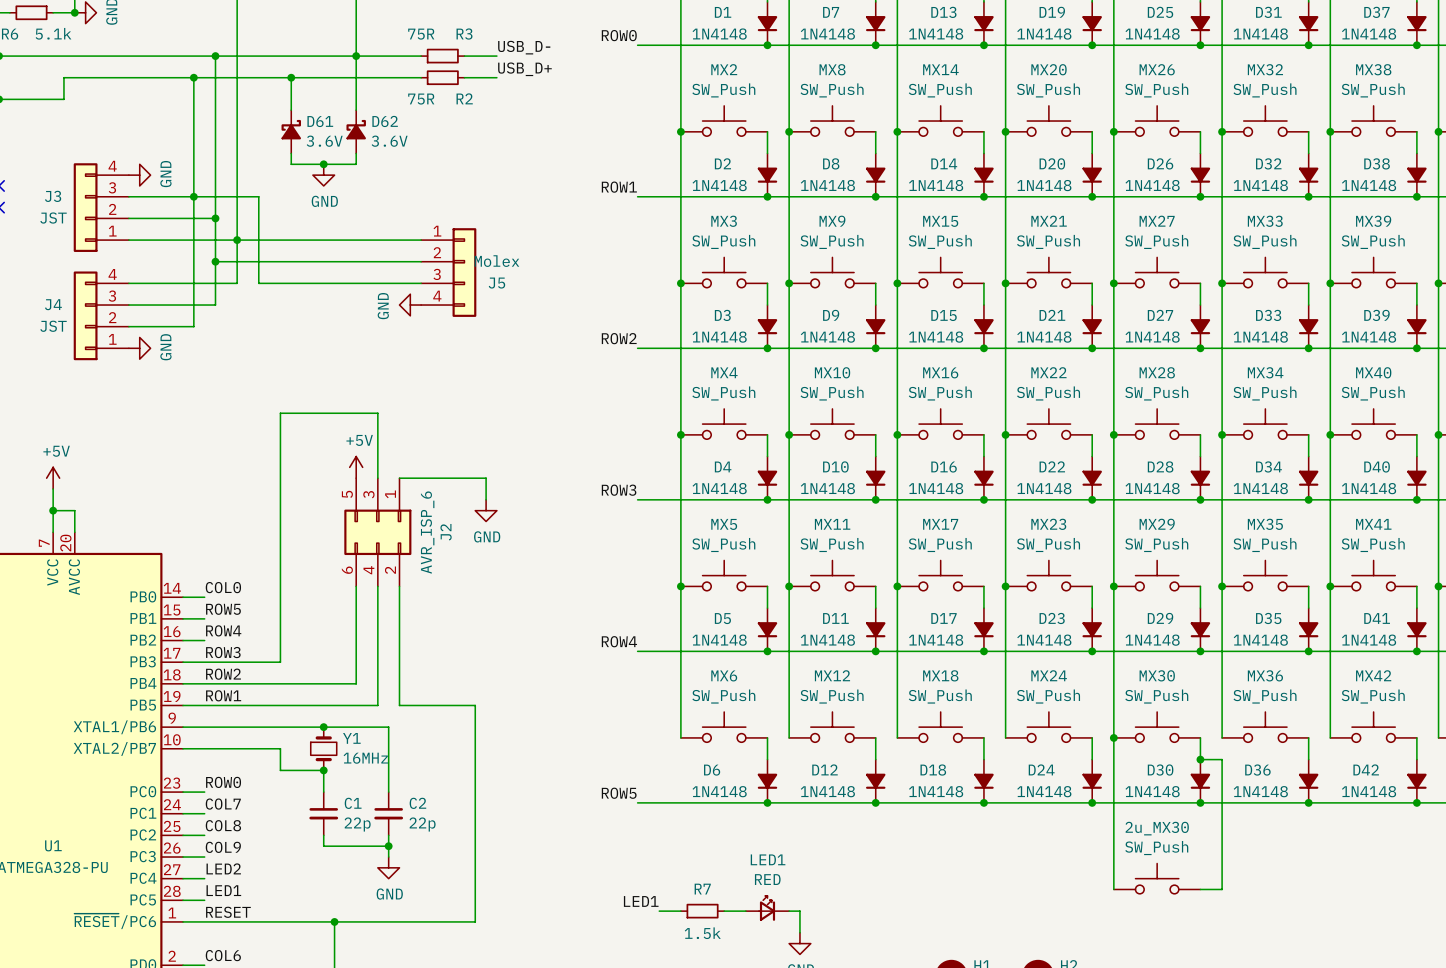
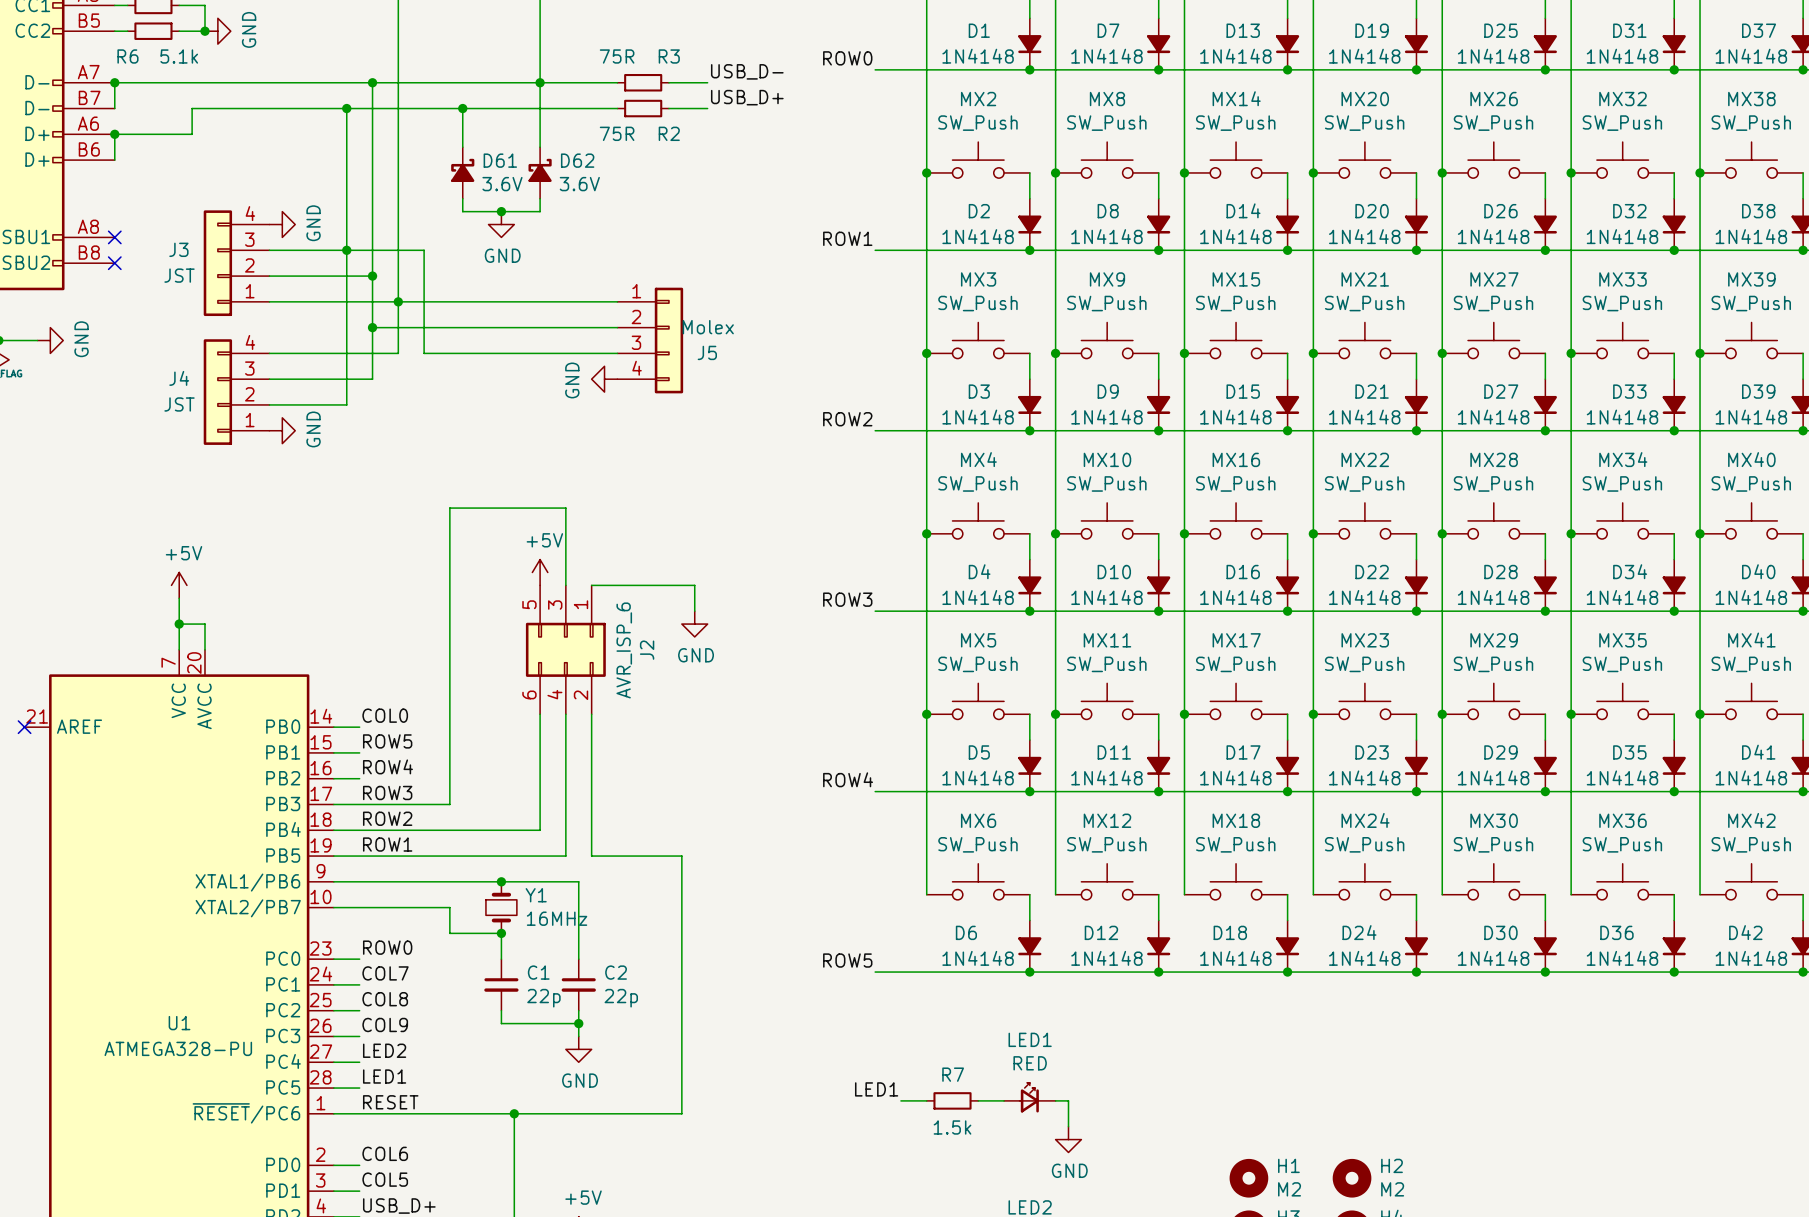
wire: (1113, 737) (1113, 889) -> none
junction: (1113, 737) -> none
wire: (1200, 759) (1222, 759) (1222, 889) (1200, 889) -> none
junction: (1200, 759) -> none
2u_MX30: SW_Push (1157, 878) -> none

